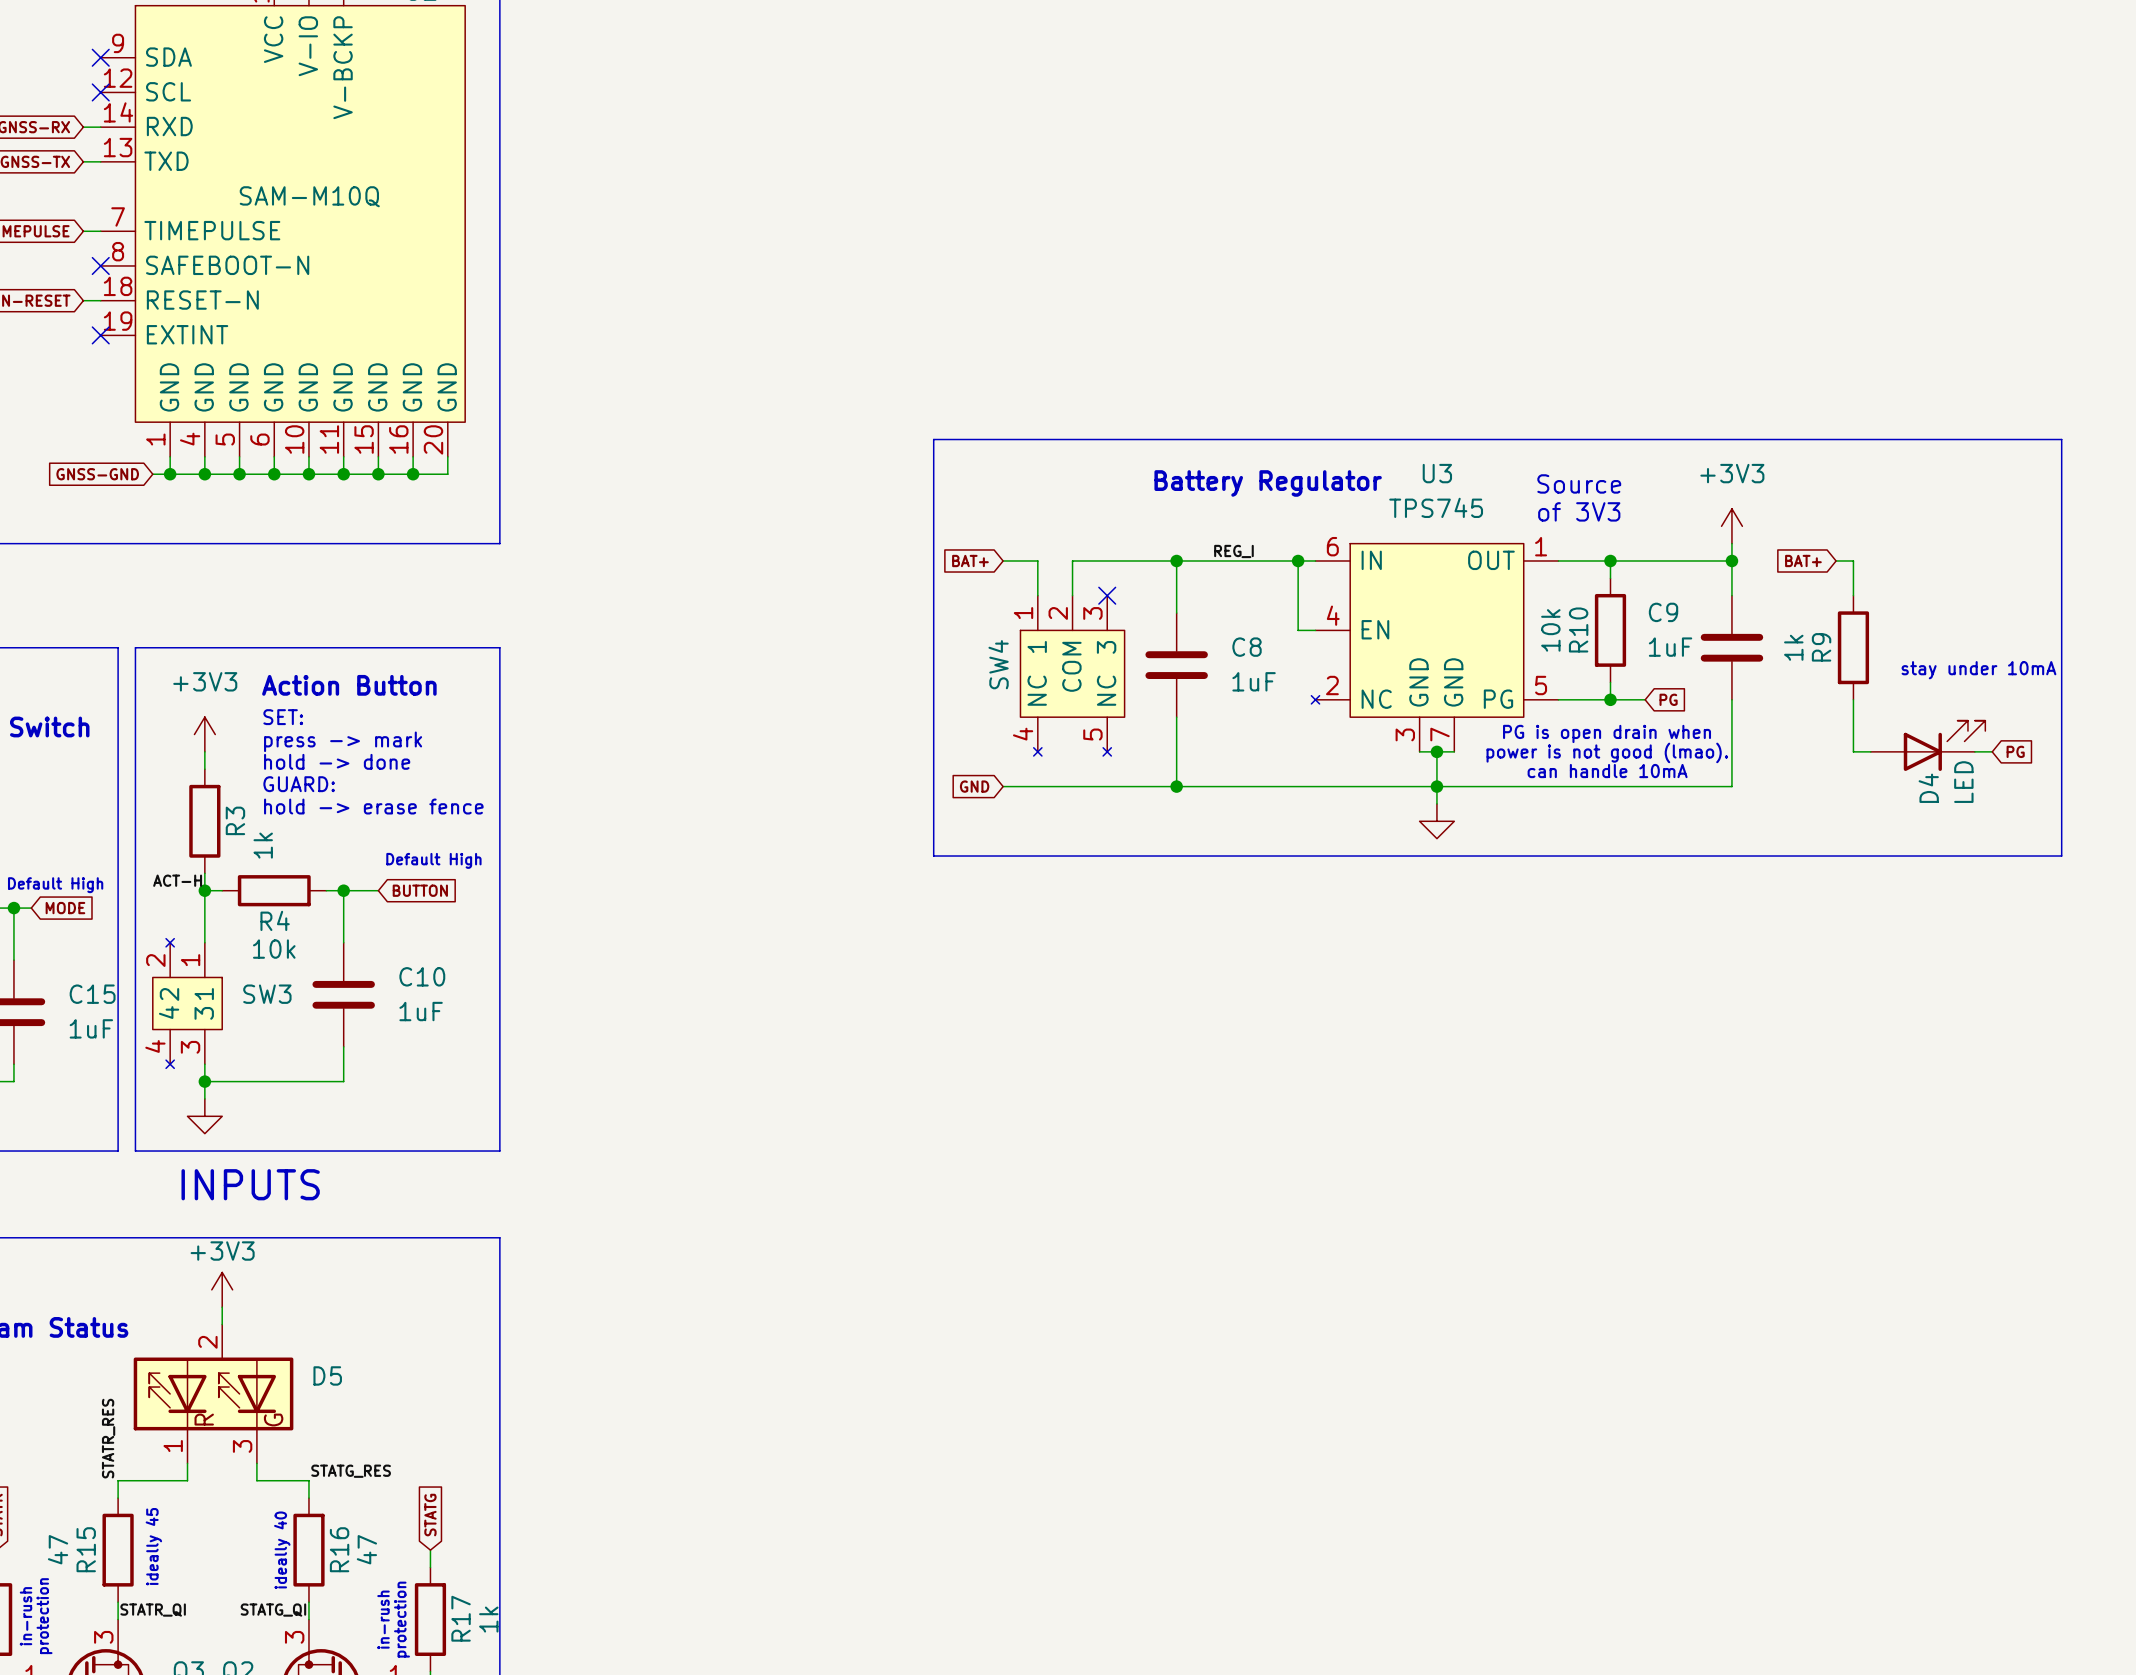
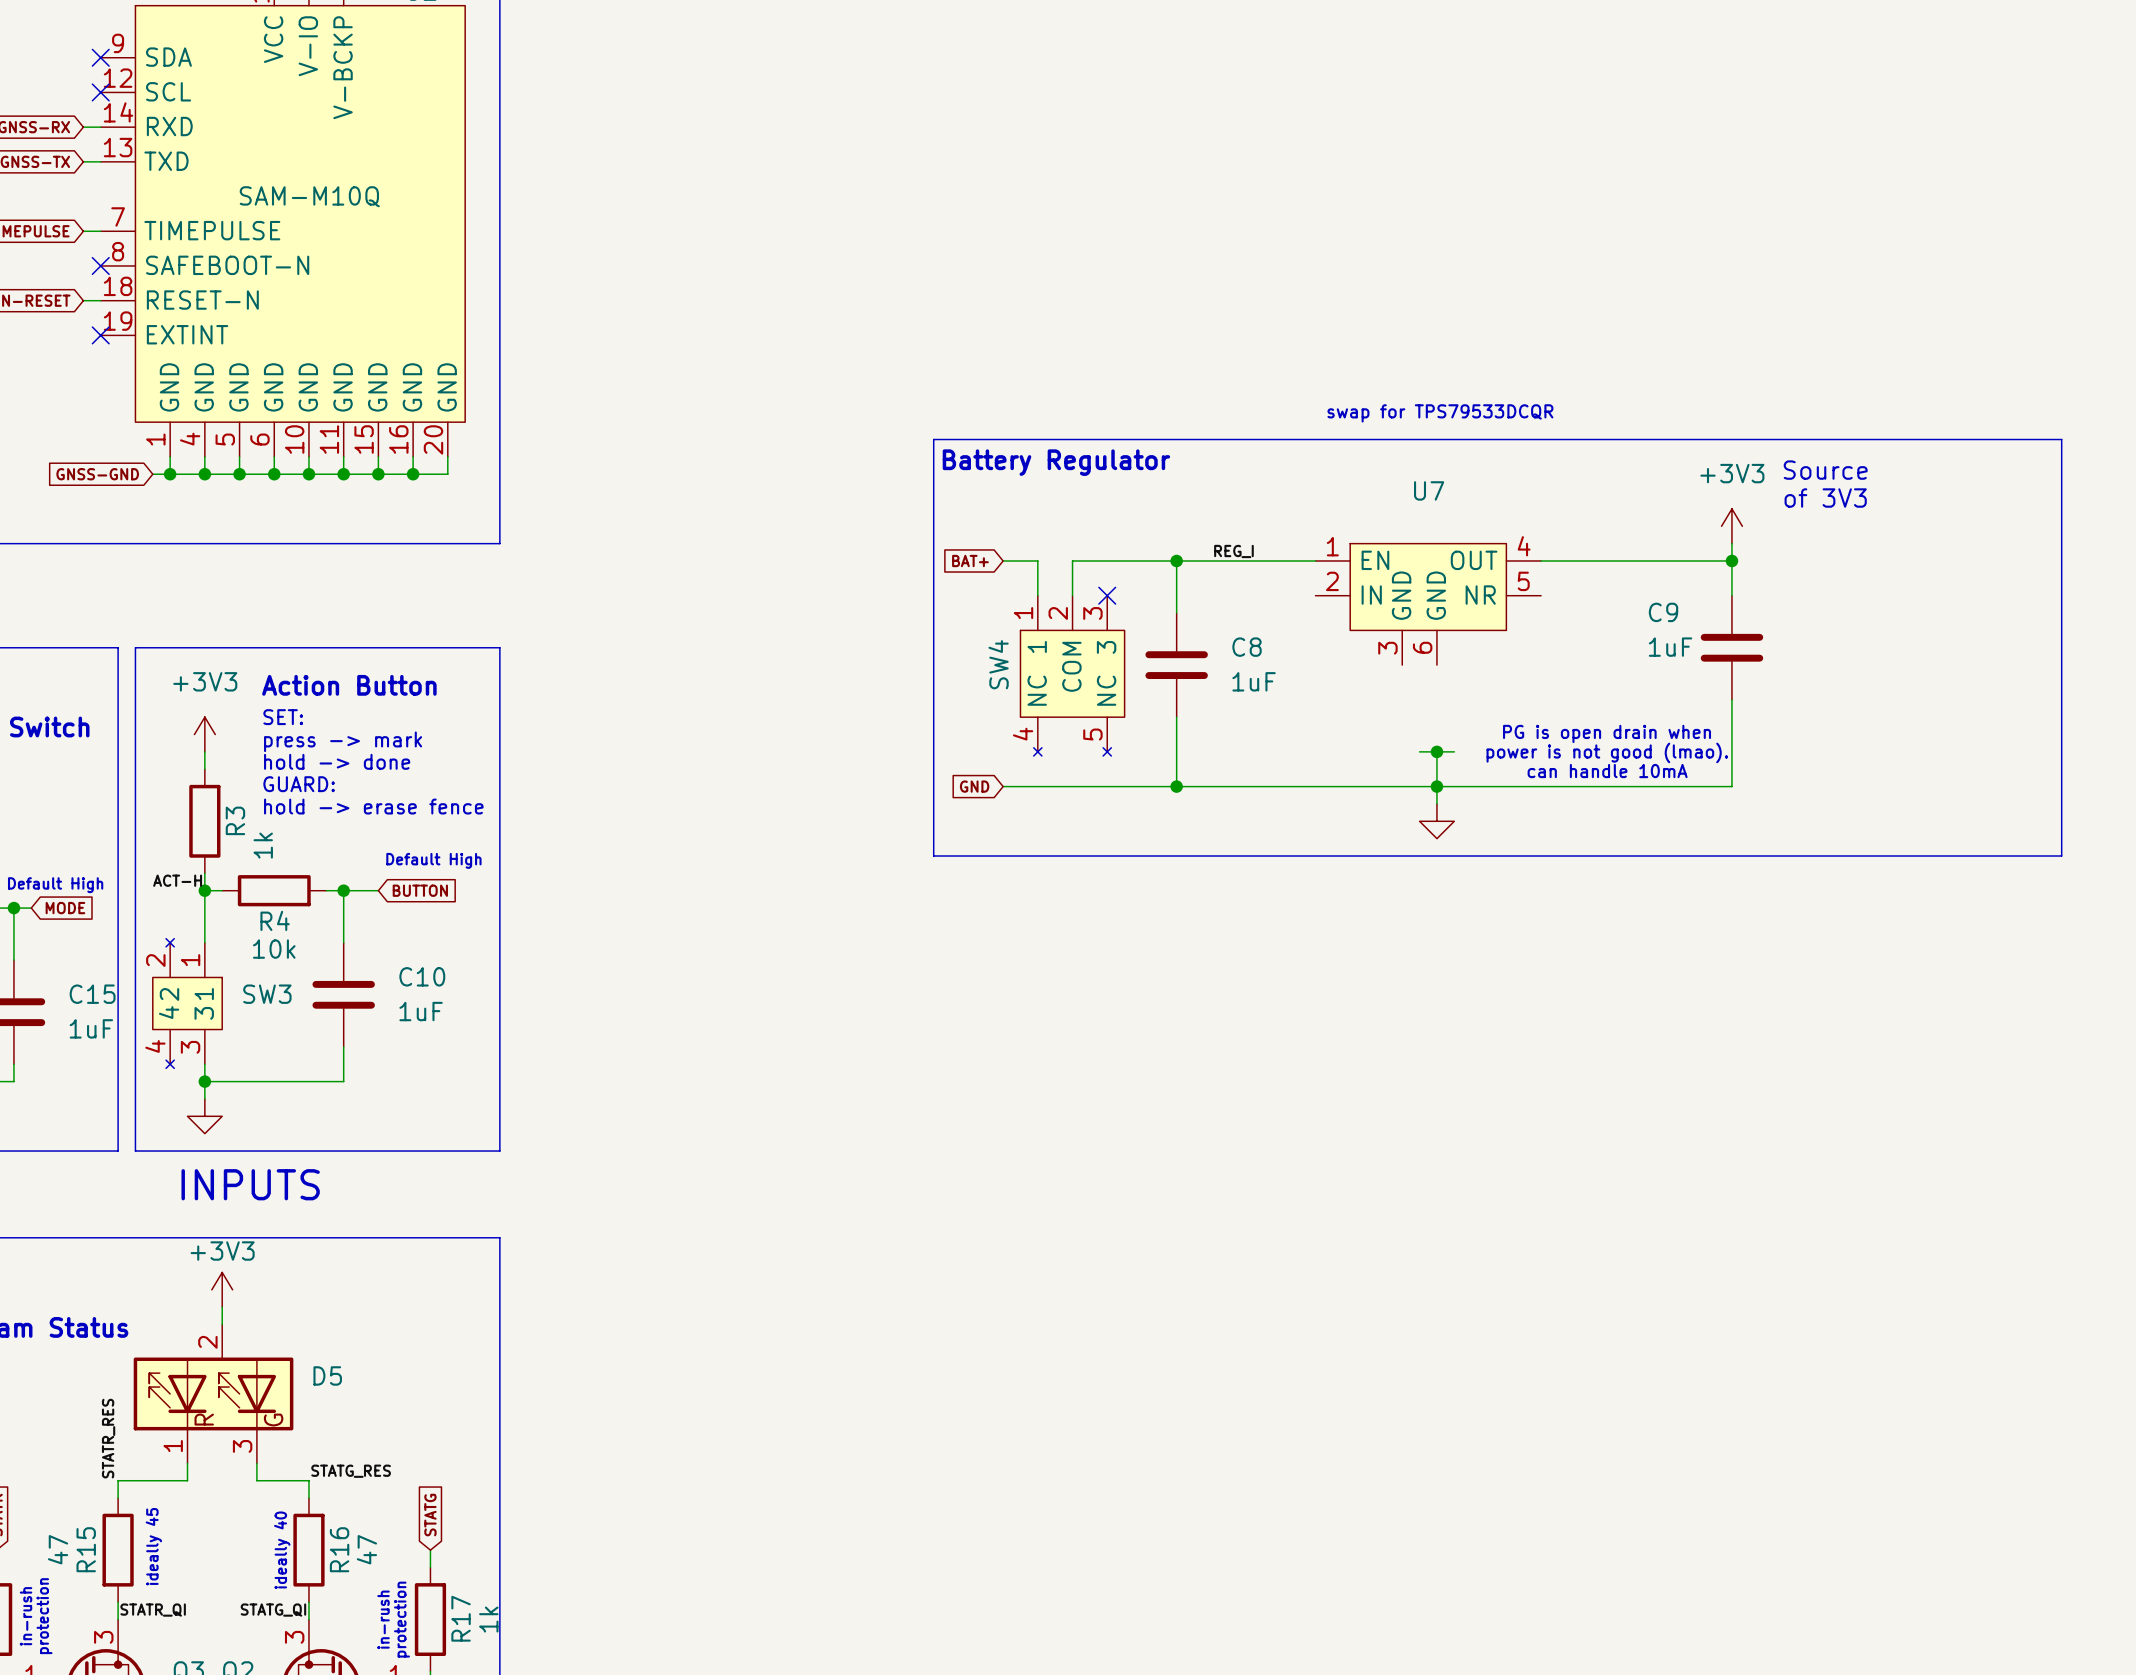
text: none -> swap for TPS79533DCQR (1440, 413)
text position: Battery Regulator (1268, 483) -> Battery Regulator (1056, 462)
text position: Source (1579, 483) -> Source (1825, 470)
text position: of 3V3 (1579, 511) -> of 3V3 (1825, 498)
wire: (1298, 560) (1298, 630) (1315, 630) -> none
junction: (1298, 560) -> none
wire: (1610, 560) (1610, 578) -> none
junction: (1610, 560) -> none
global label: BAT+ (1803, 560) -> none
wire: (1836, 560) (1853, 560) (1853, 595) -> none
U7: none -> (1428, 604)
R10: 10k (1610, 630) -> none
U3: TPS745 (1434, 647) -> none
R9: 1k (1853, 647) -> none
text: stay under 10mA (1978, 670) -> none
wire: (1610, 682) (1610, 699) -> none
wire: (1558, 699) (1645, 699) -> none
junction: (1610, 699) -> none
global label: PG (1668, 699) -> none
wire: (1853, 699) (1853, 751) (1870, 751) -> none
D4: LED (1928, 745) -> none
wire: (1974, 751) (1992, 751) -> none
global label: PG (2015, 751) -> none

